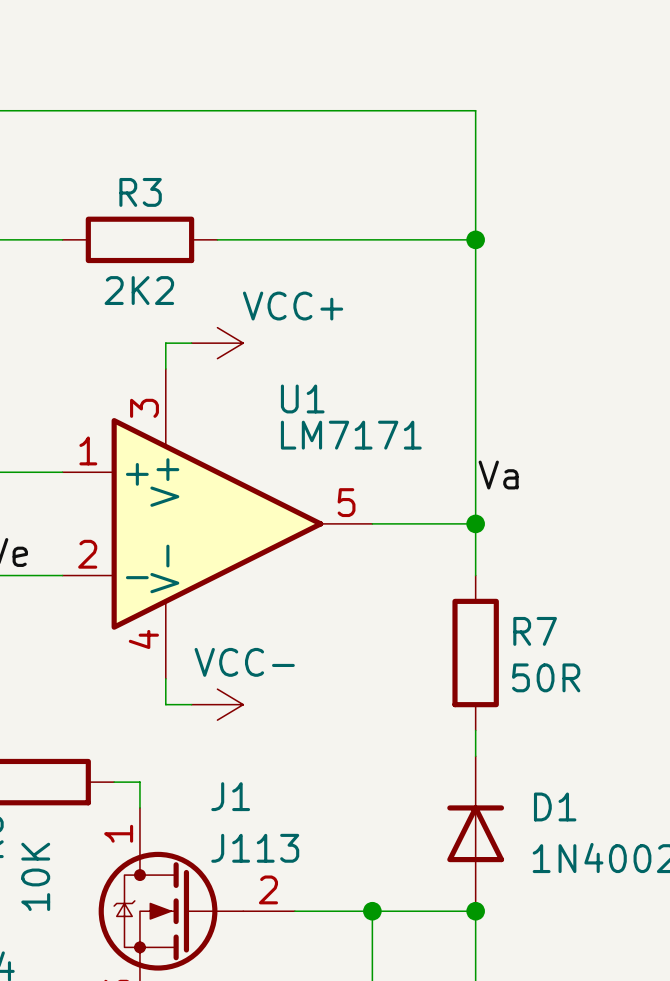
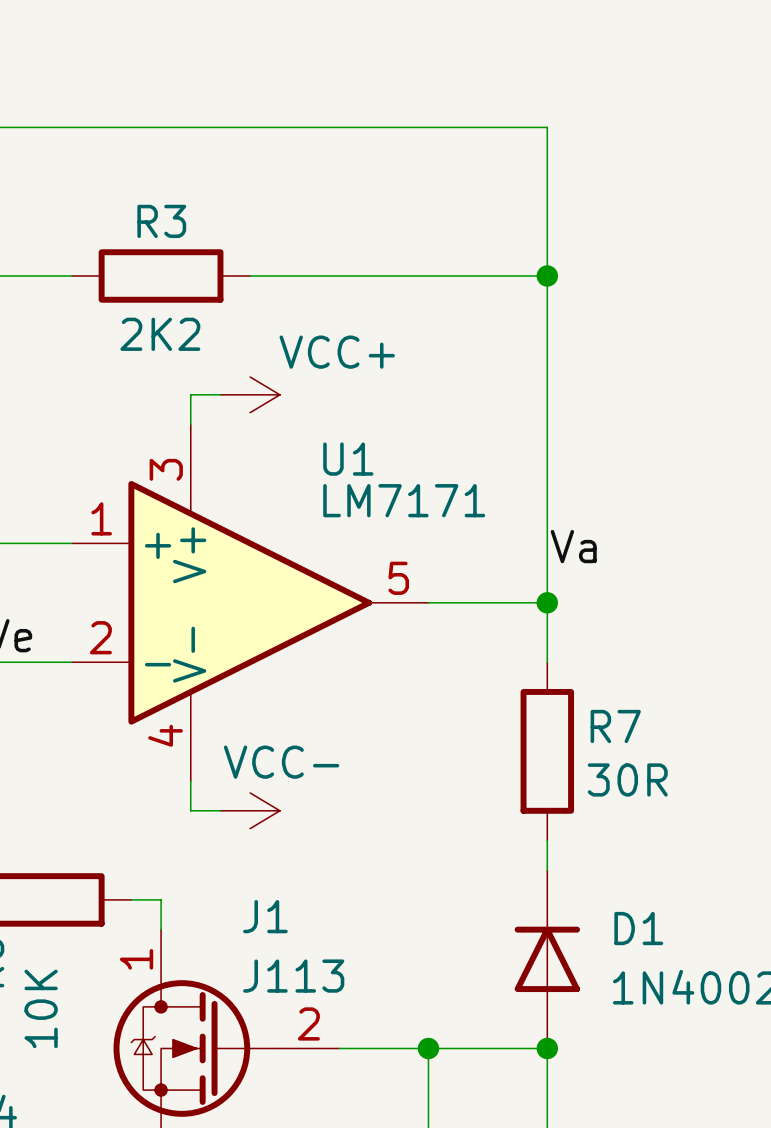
R7 value: 50R (546, 677) -> 30R (627, 779)

